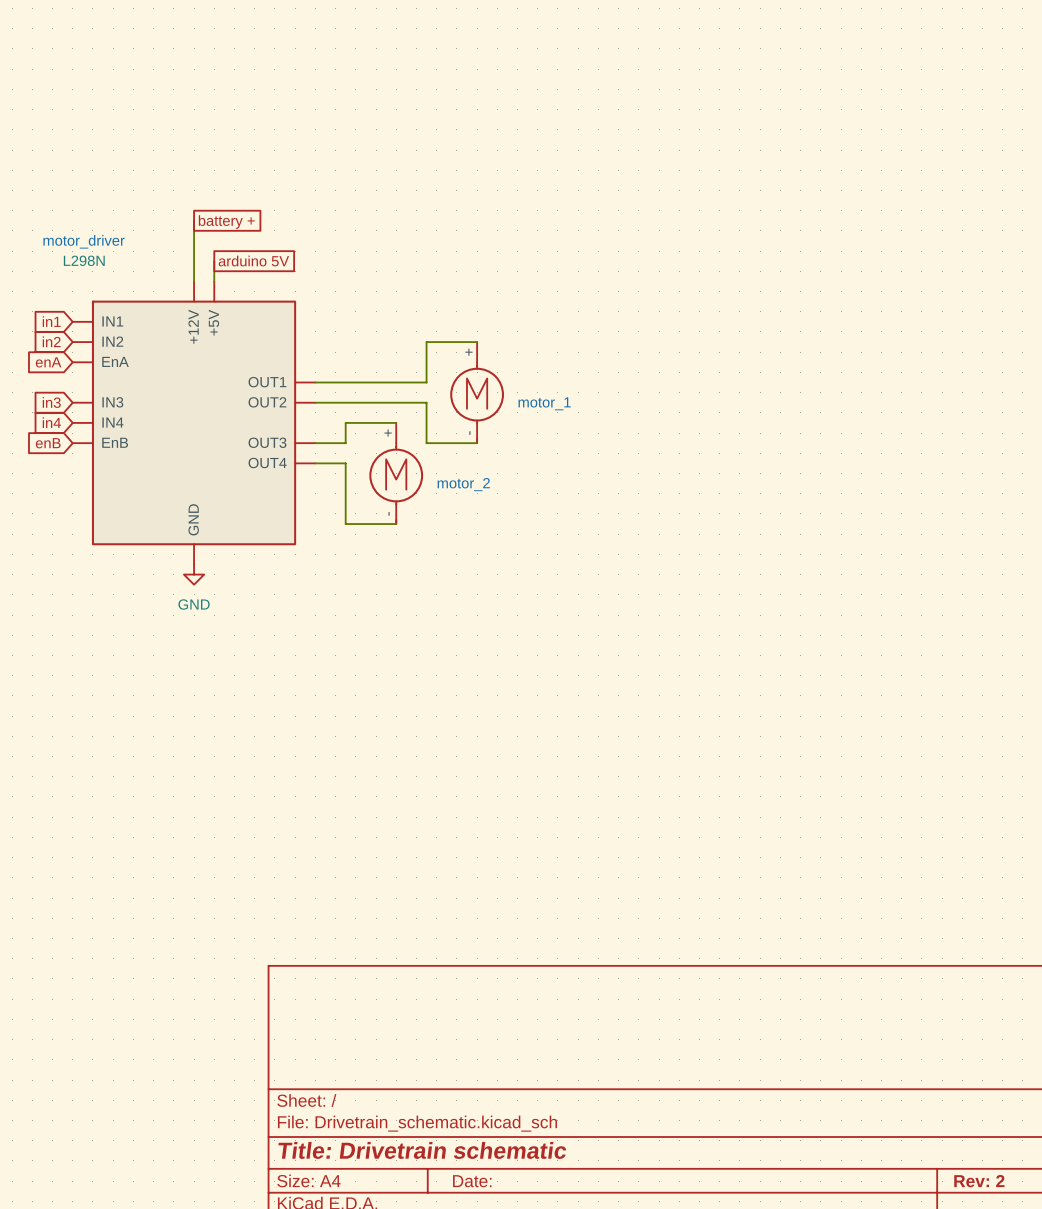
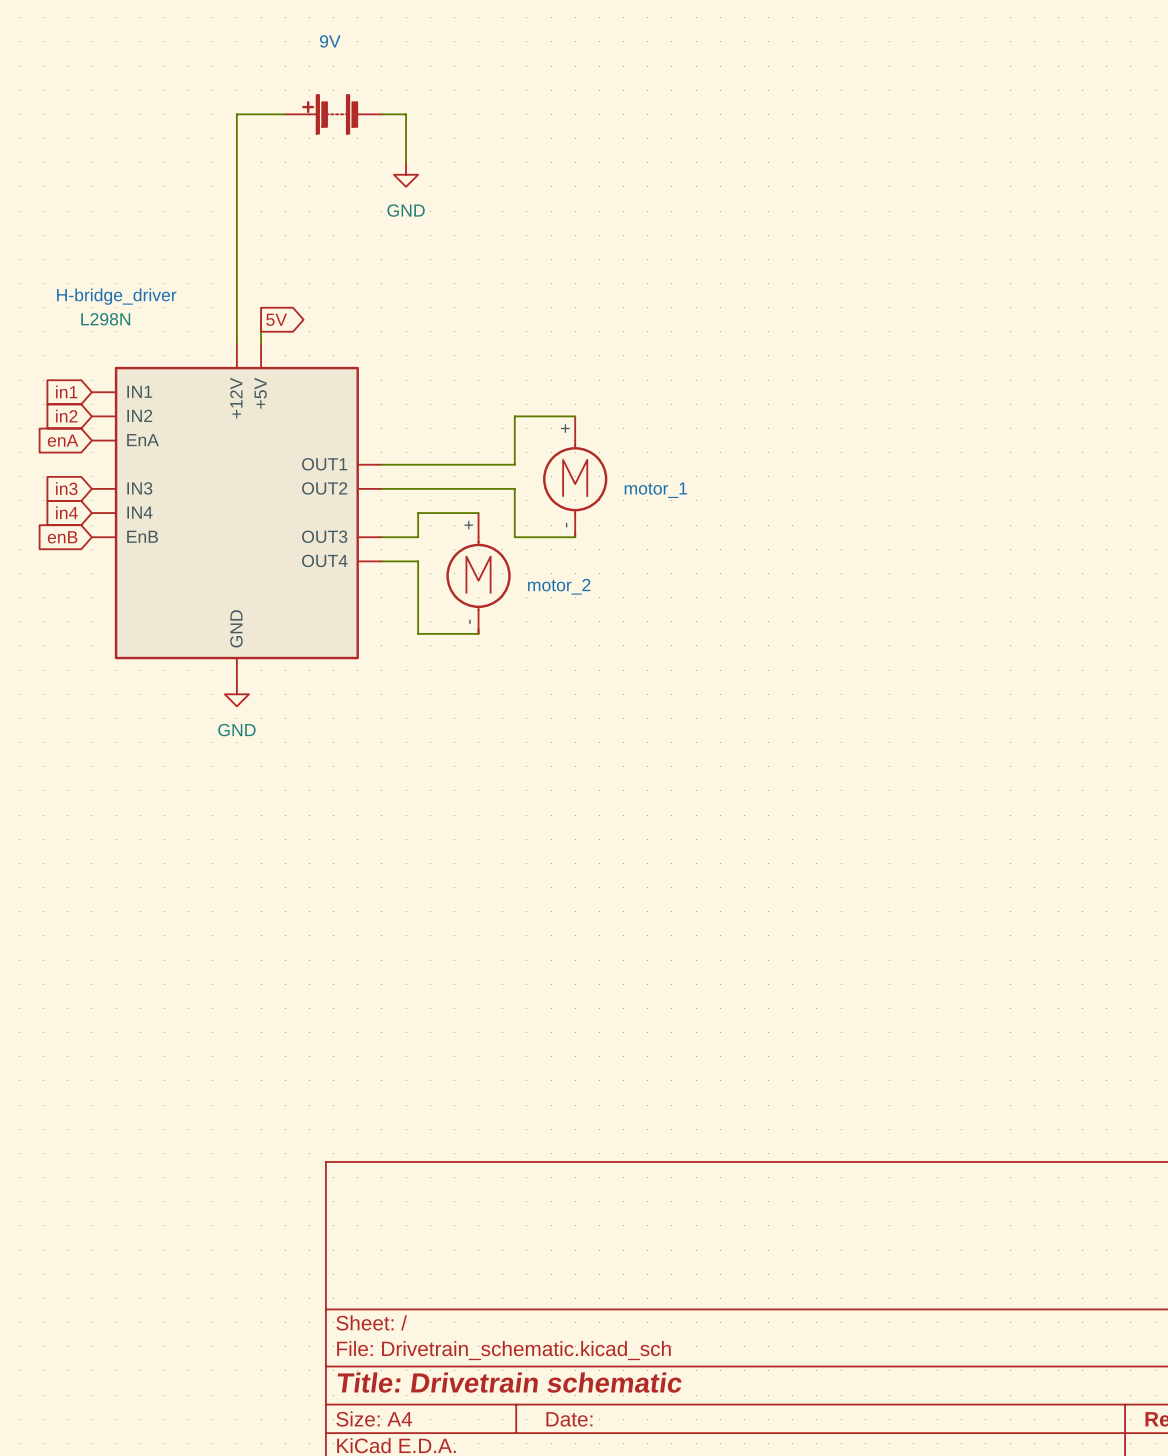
wire: none -> (285, 114) (236, 114) (236, 271)
9V: none -> (333, 114)
wire: none -> (381, 114) (406, 114) (406, 162)
power symbol: none -> GND (406, 174)
global label: battery + (226, 222) -> none
motor_driver name: motor_driver (84, 241) -> H-bridge_driver (116, 296)
global label shape: passive (253, 261) -> output (276, 319)
global label: arduino 5V (253, 261) -> 5V (276, 319)

